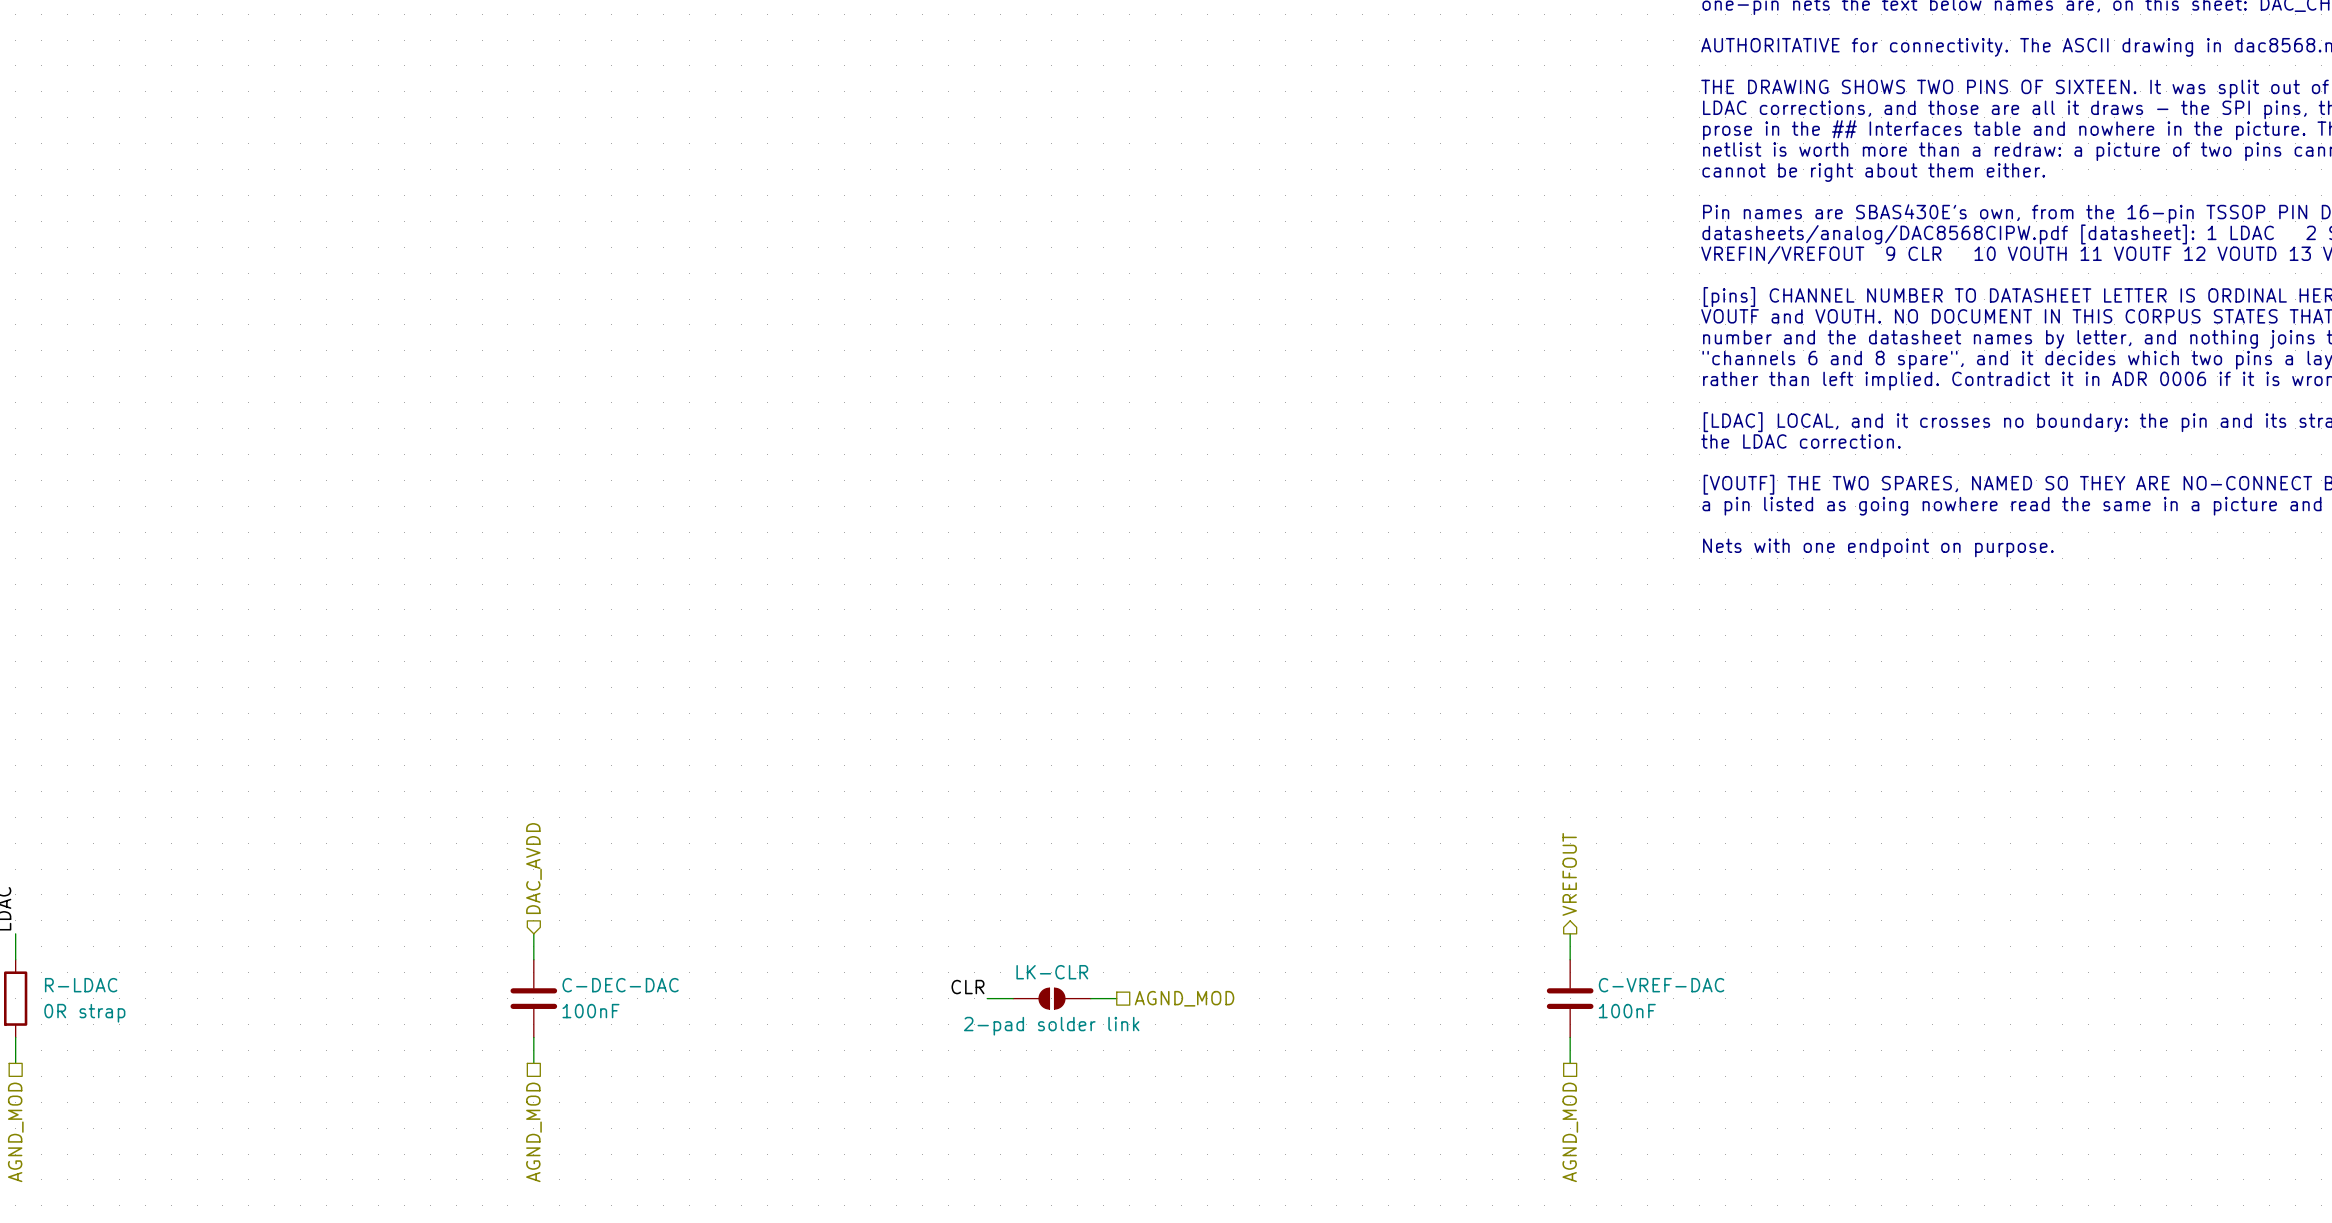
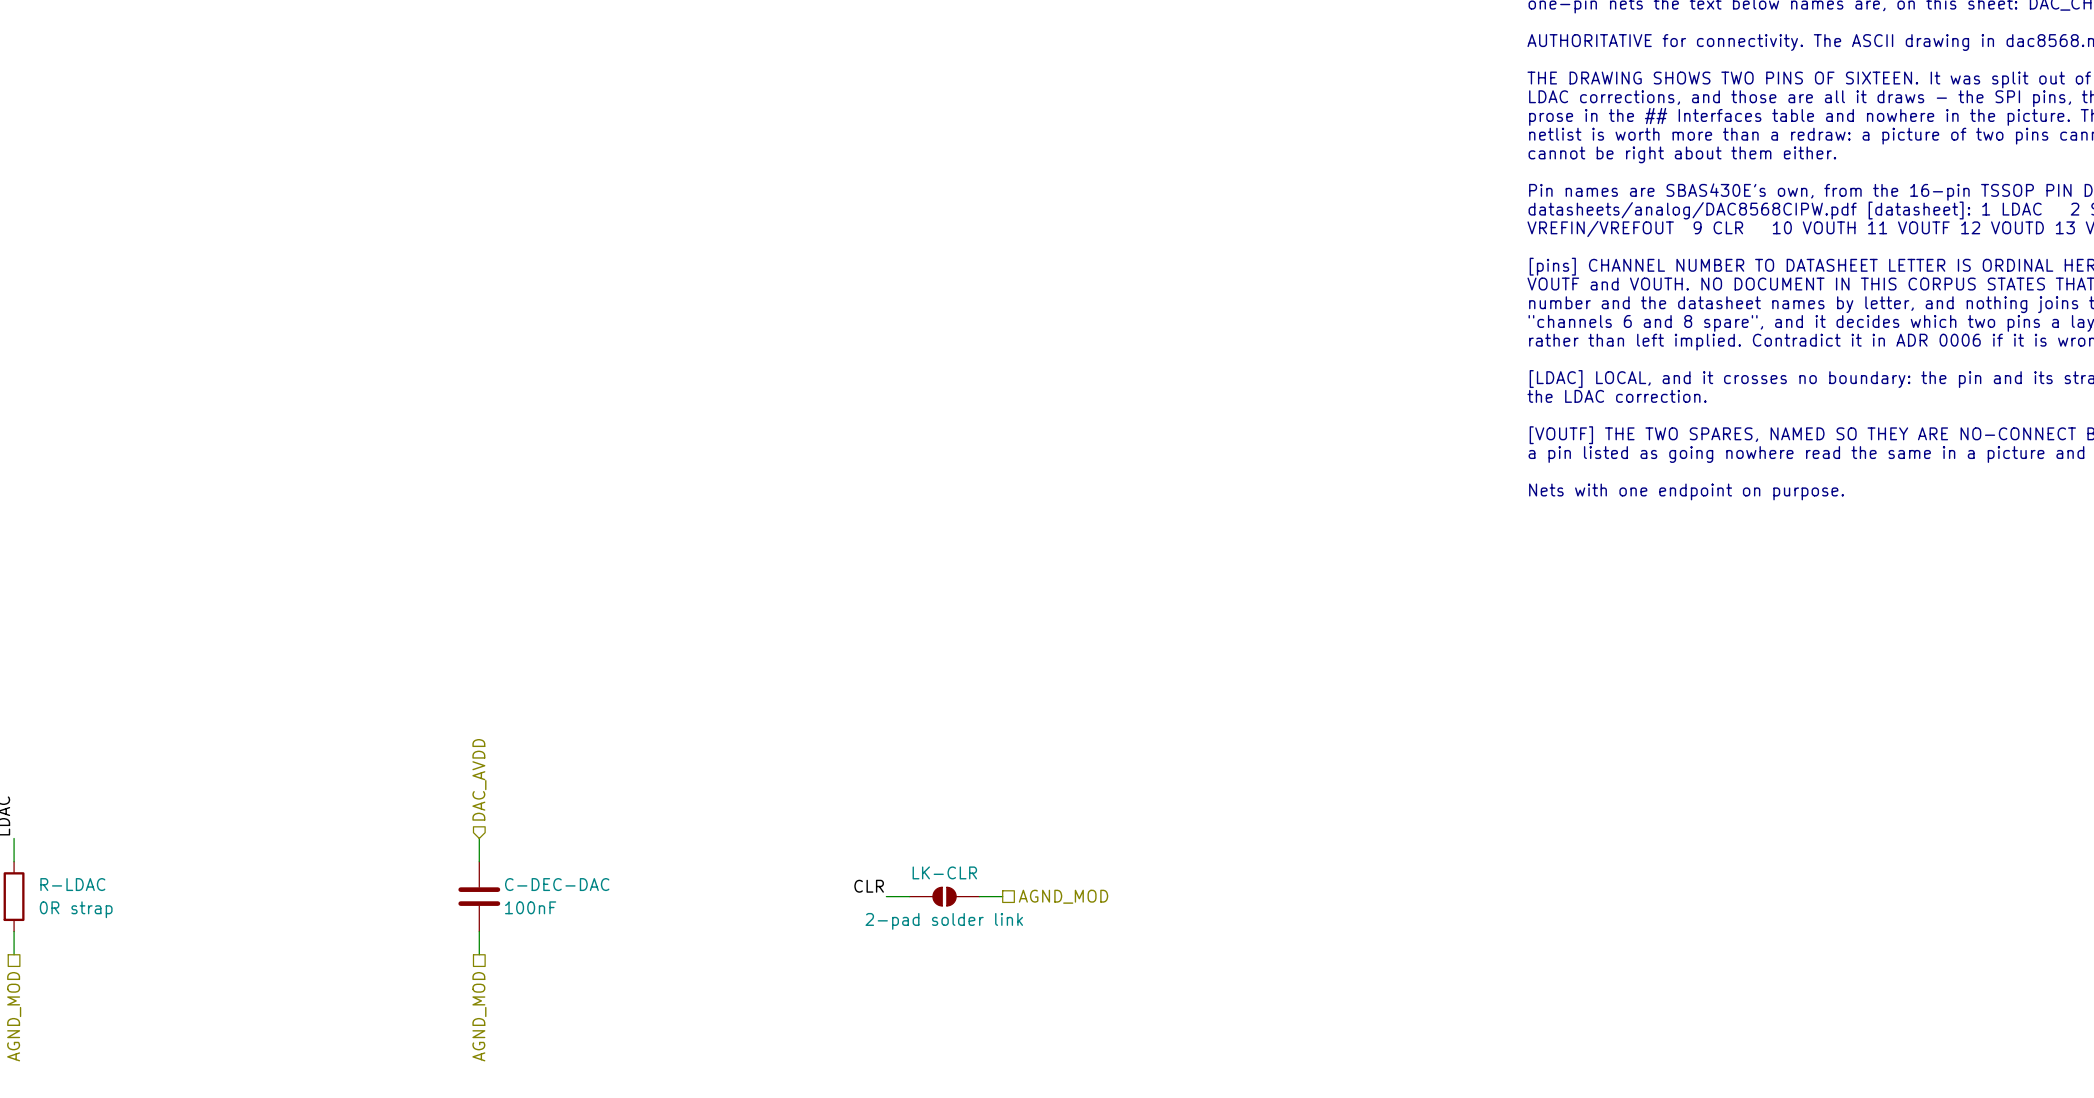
hierarchical label: VREFOUT (1569, 874) -> none
wire: (1570, 933) (1570, 959) -> none
C-VREF-DAC: 100nF (1570, 998) -> none
wire: (1570, 1037) (1570, 1063) -> none
hierarchical label: AGND_MOD (1570, 1132) -> none

